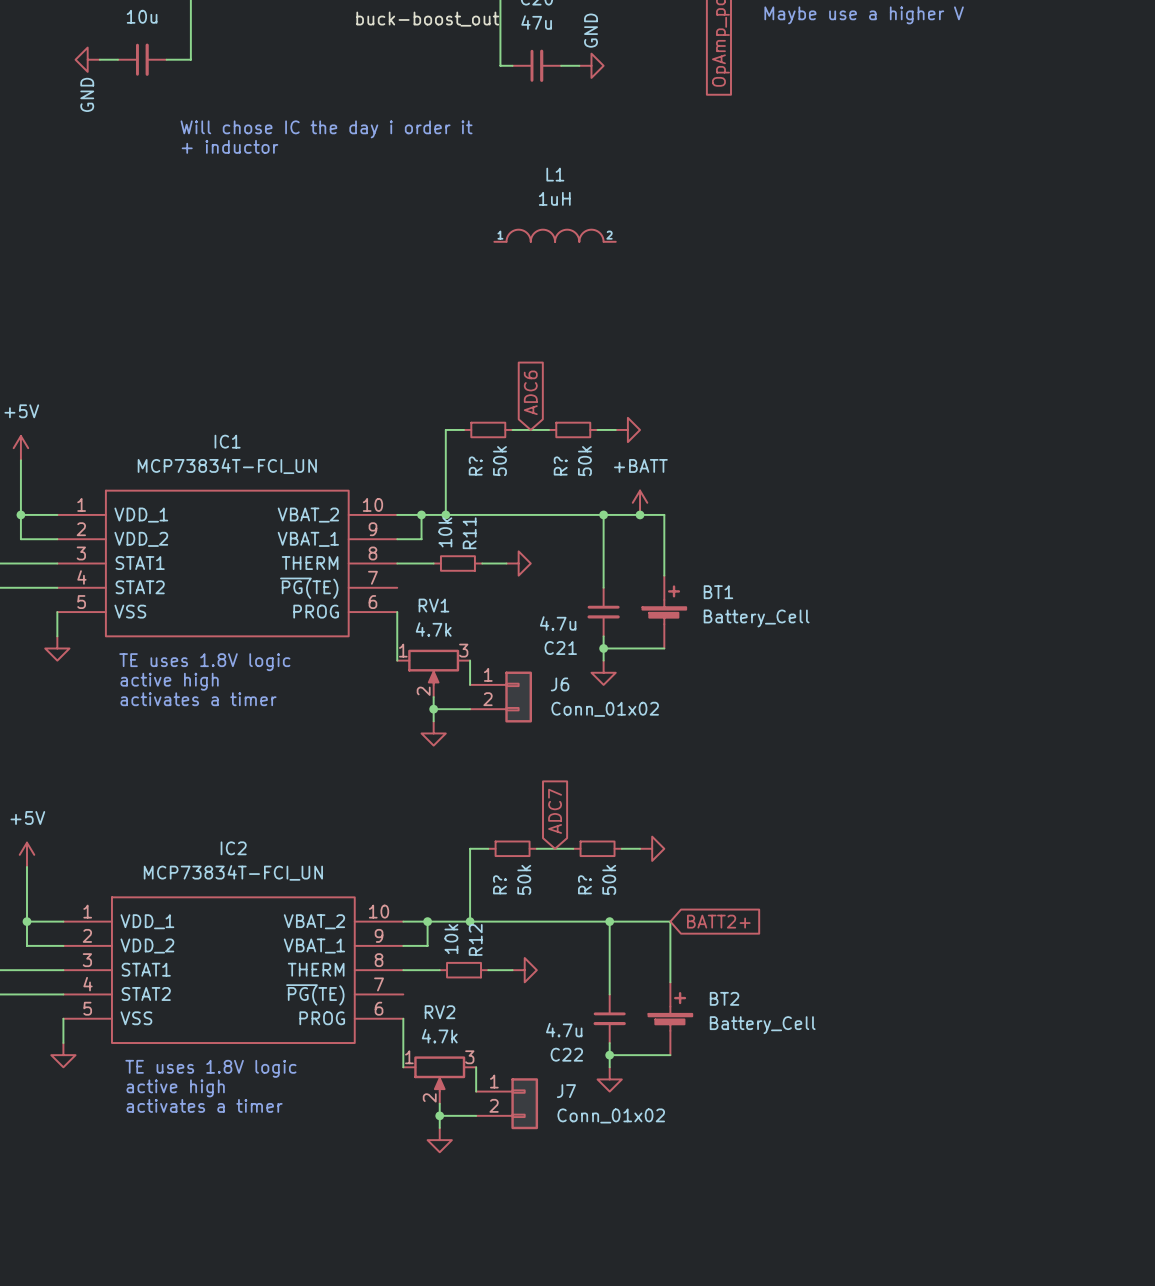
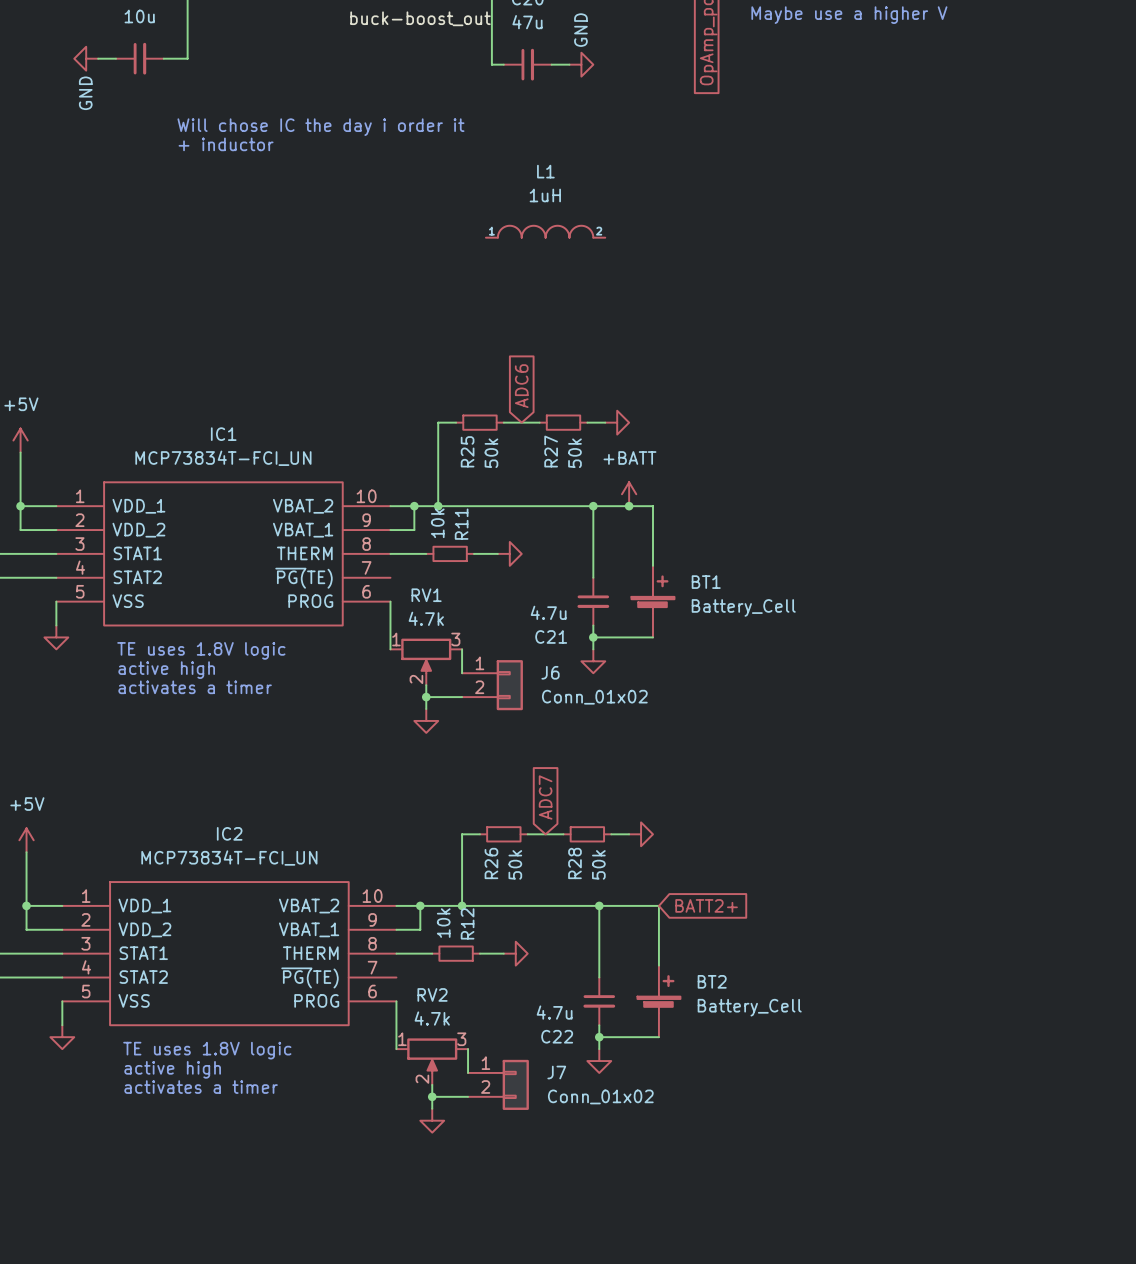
R? name: R? (475, 466) -> R25 (467, 451)
R? name: R? (560, 466) -> R27 (551, 451)
R? name: R? (499, 884) -> R26 (491, 863)
R? name: R? (584, 884) -> R28 (574, 863)

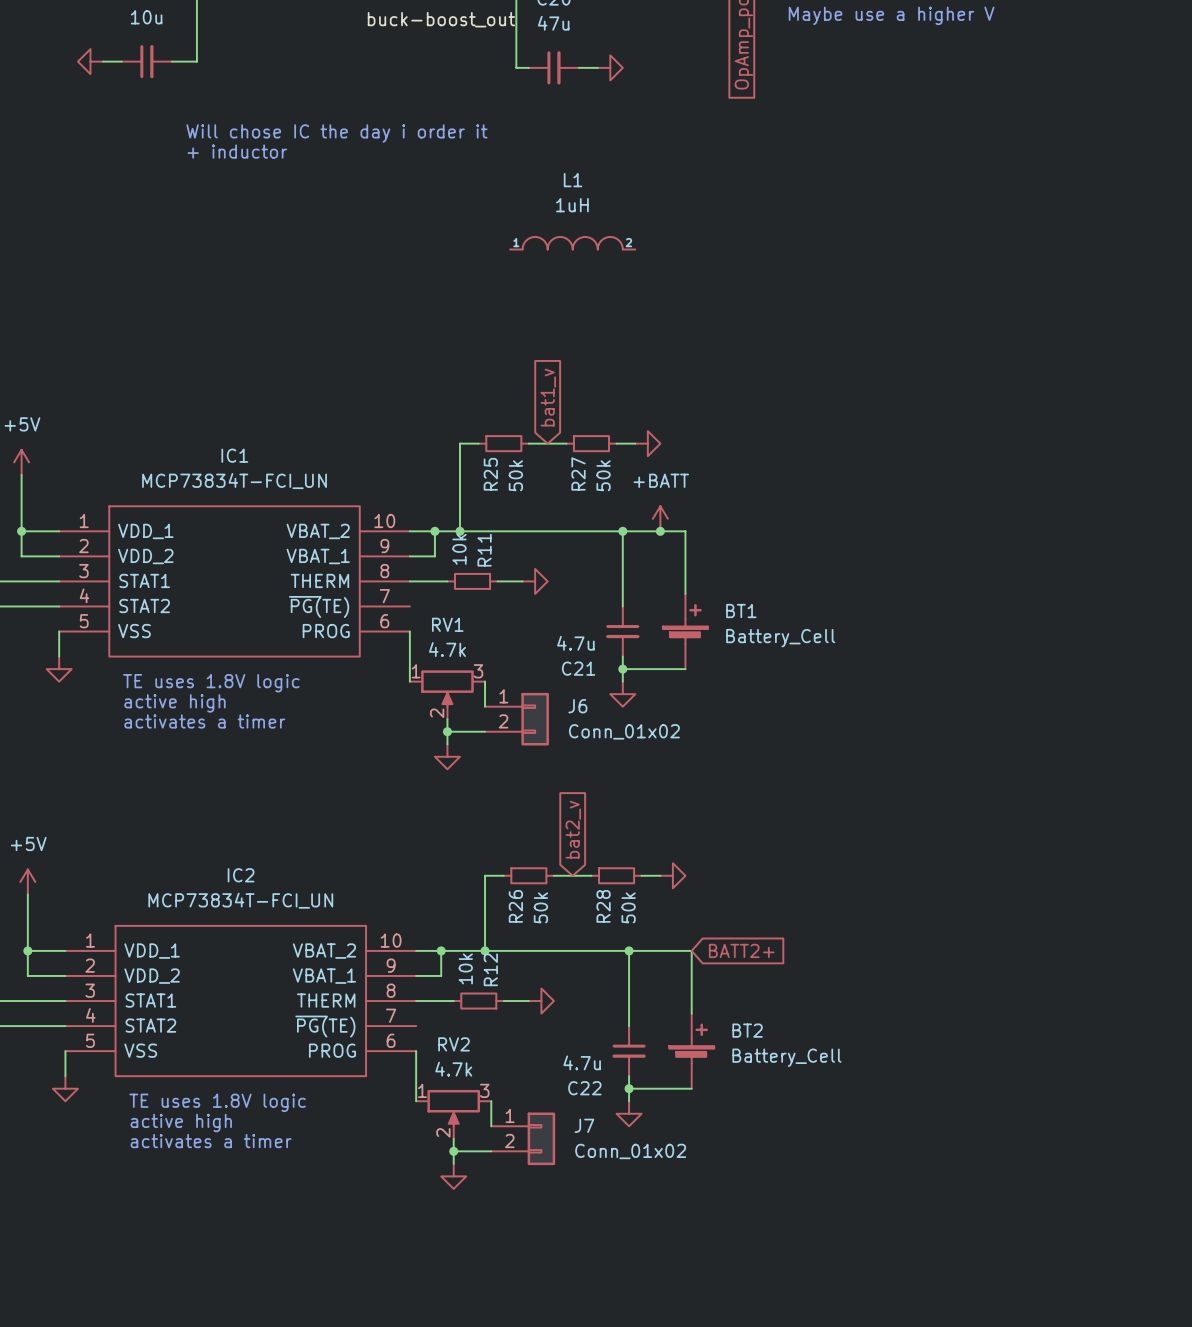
power symbol text: GND (580, 30) -> none
power symbol text: GND (85, 93) -> none
global label: ADC6 (521, 386) -> bat1_v (548, 397)
global label: ADC7 (545, 797) -> bat2_v (573, 829)

